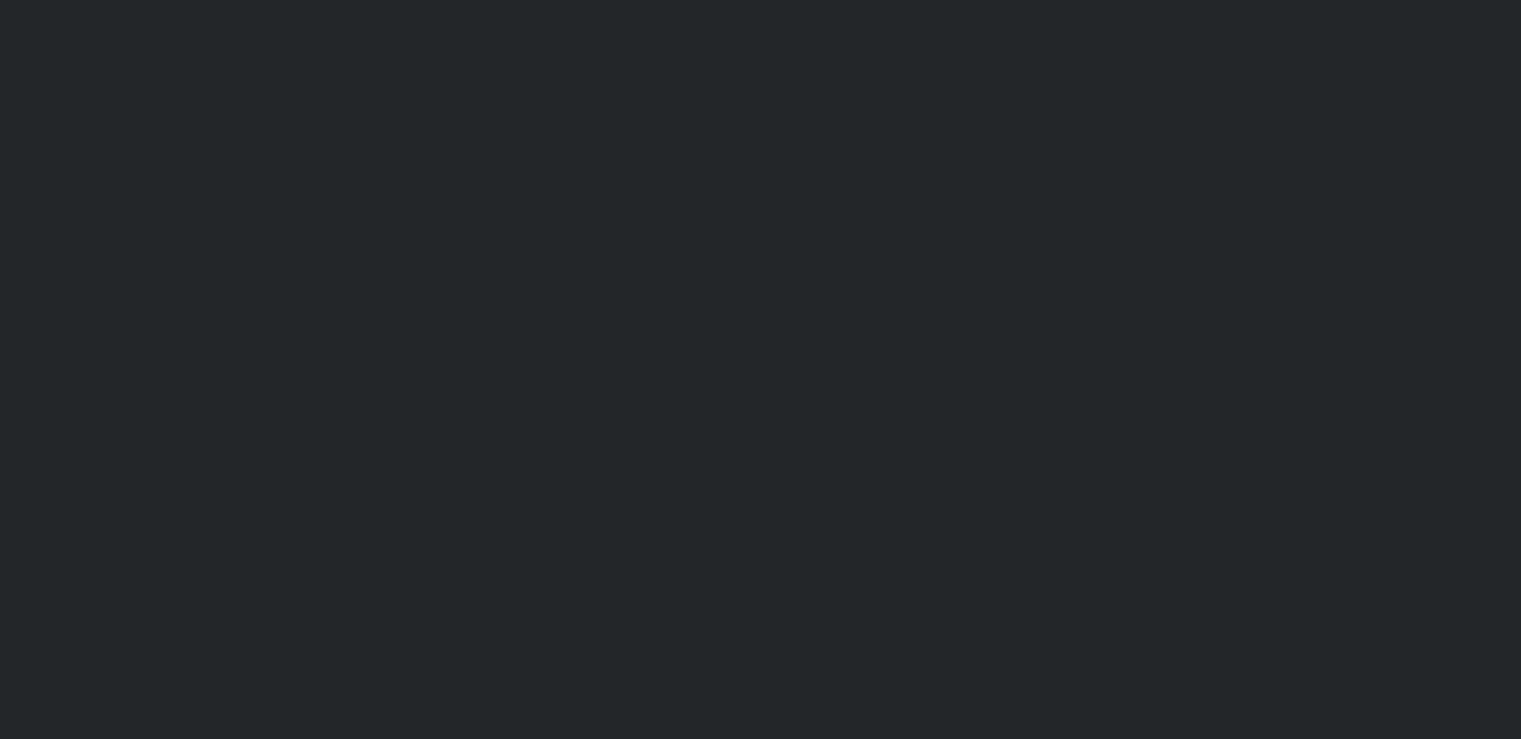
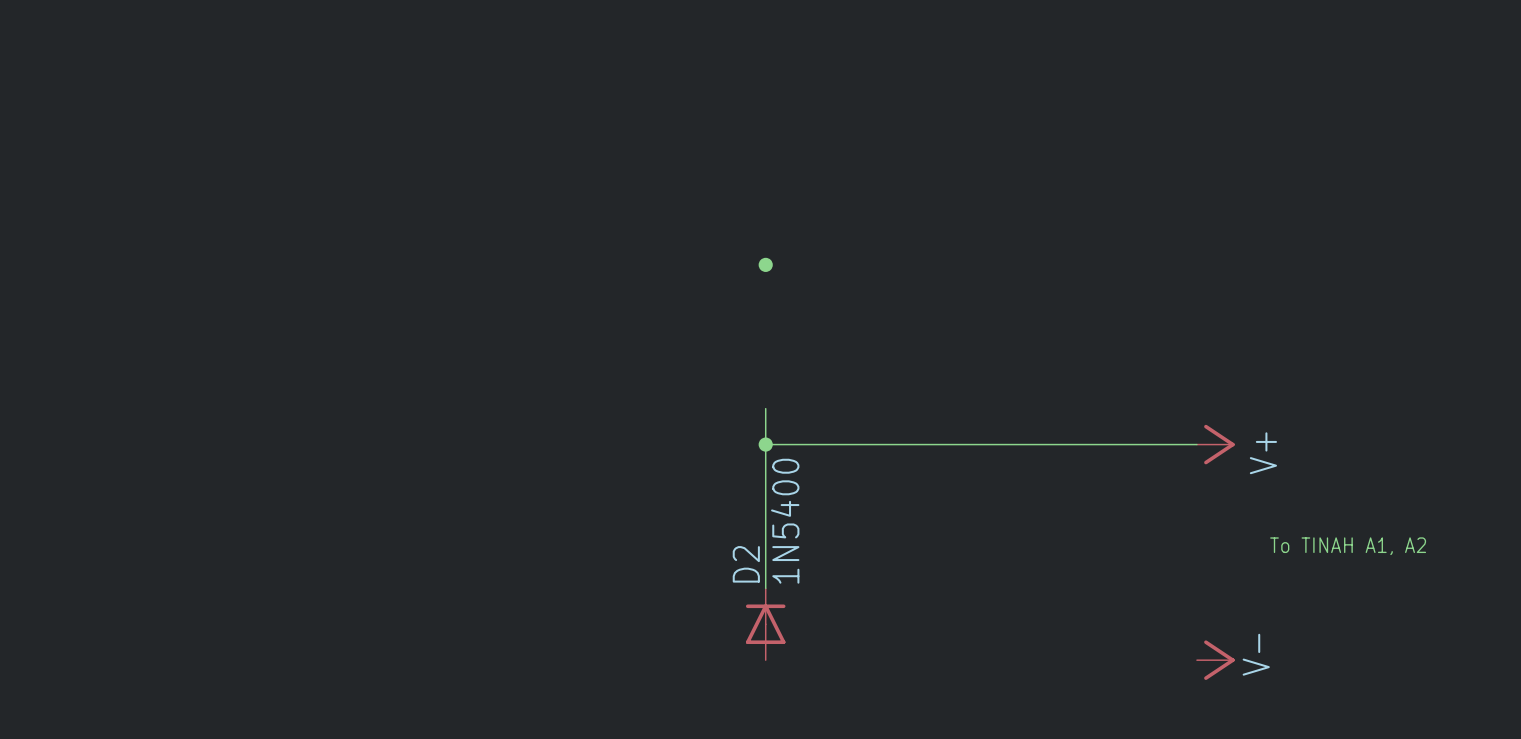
junction: none -> (765, 264)
wire: none -> (765, 408) (765, 588)
wire: none -> (765, 444) (1196, 444)
junction: none -> (765, 444)
power symbol: none -> V+ (1215, 444)
text: none -> To TINAH A1, A2 (1348, 546)
D2: none -> 1N5400 (765, 624)
power symbol: none -> V- (1215, 660)

